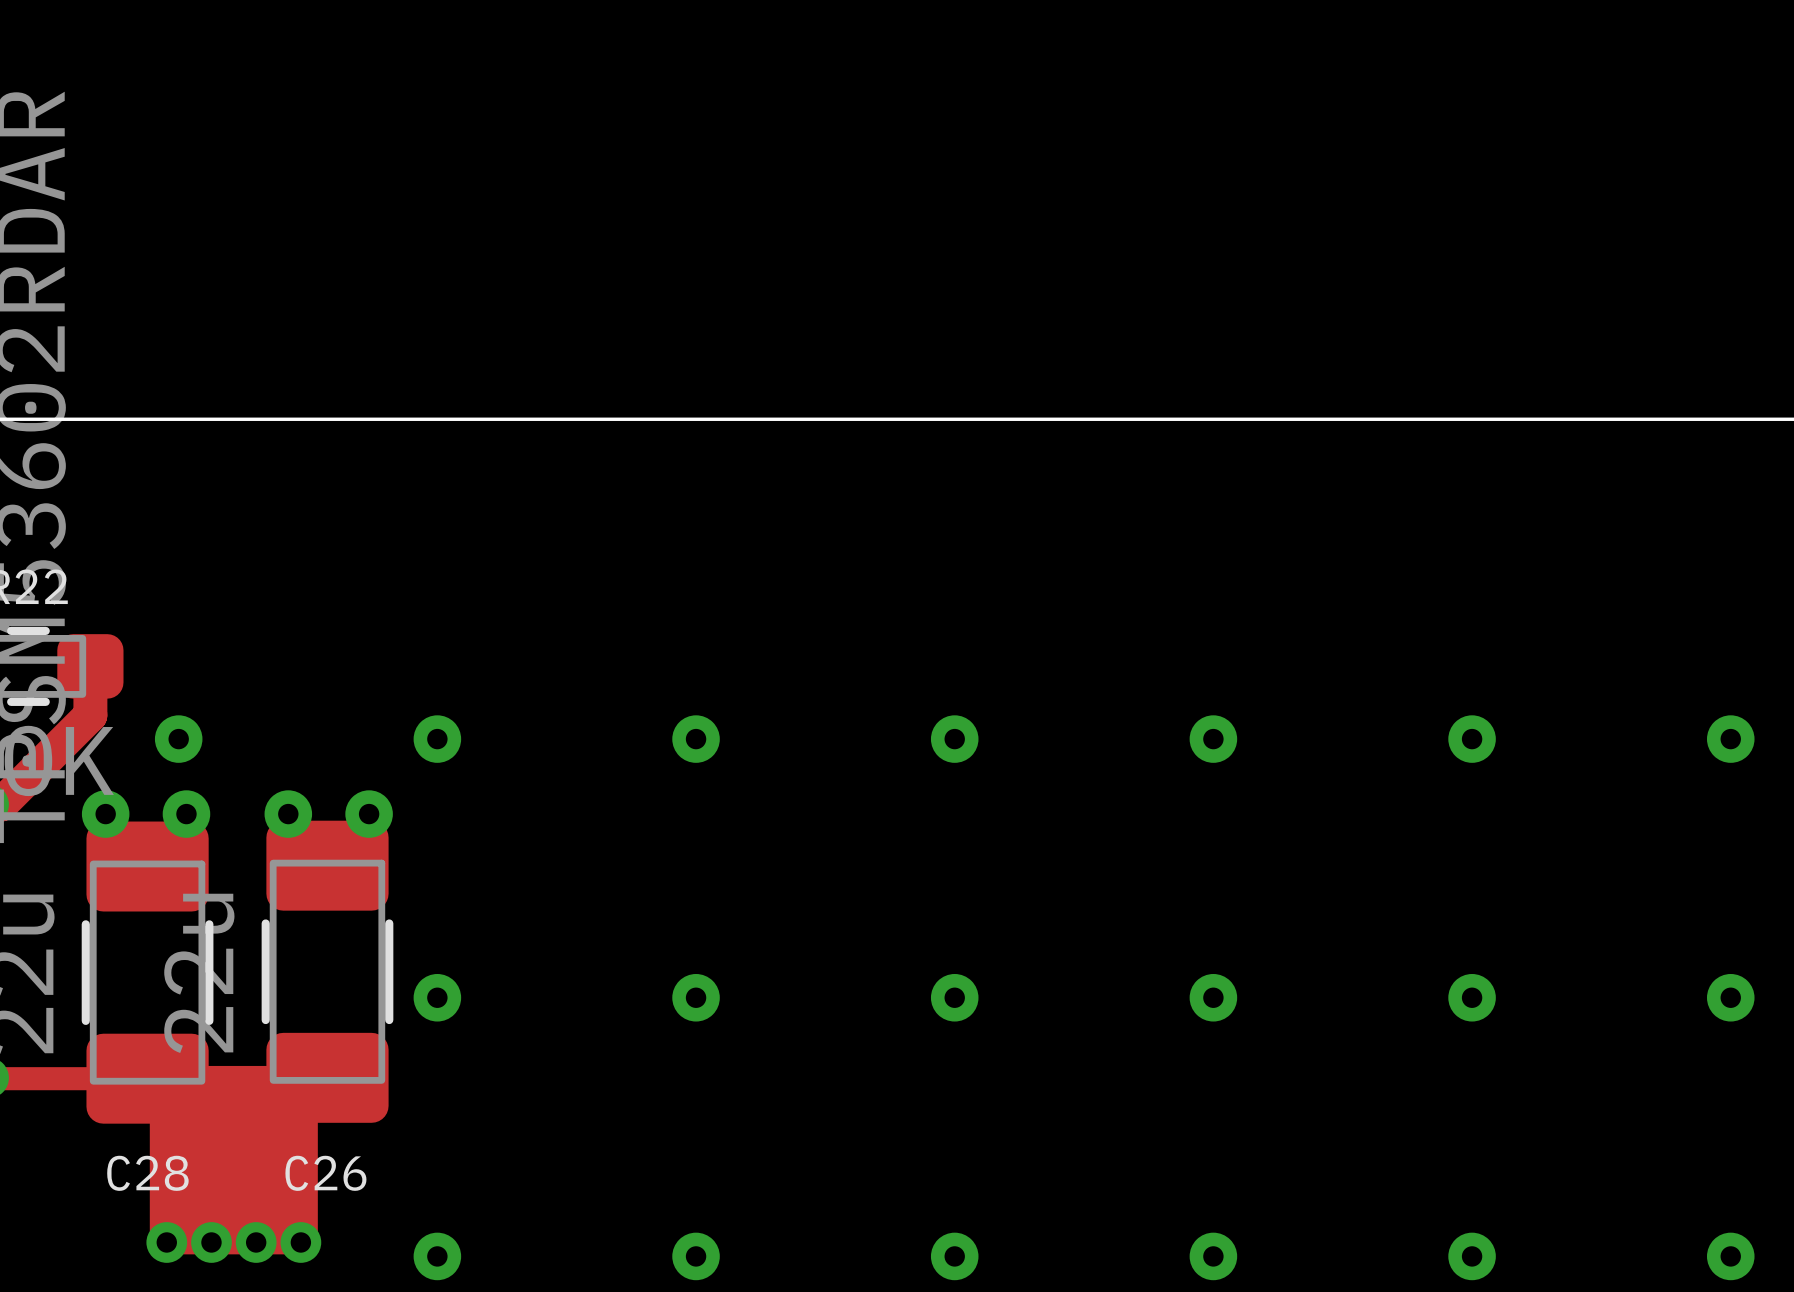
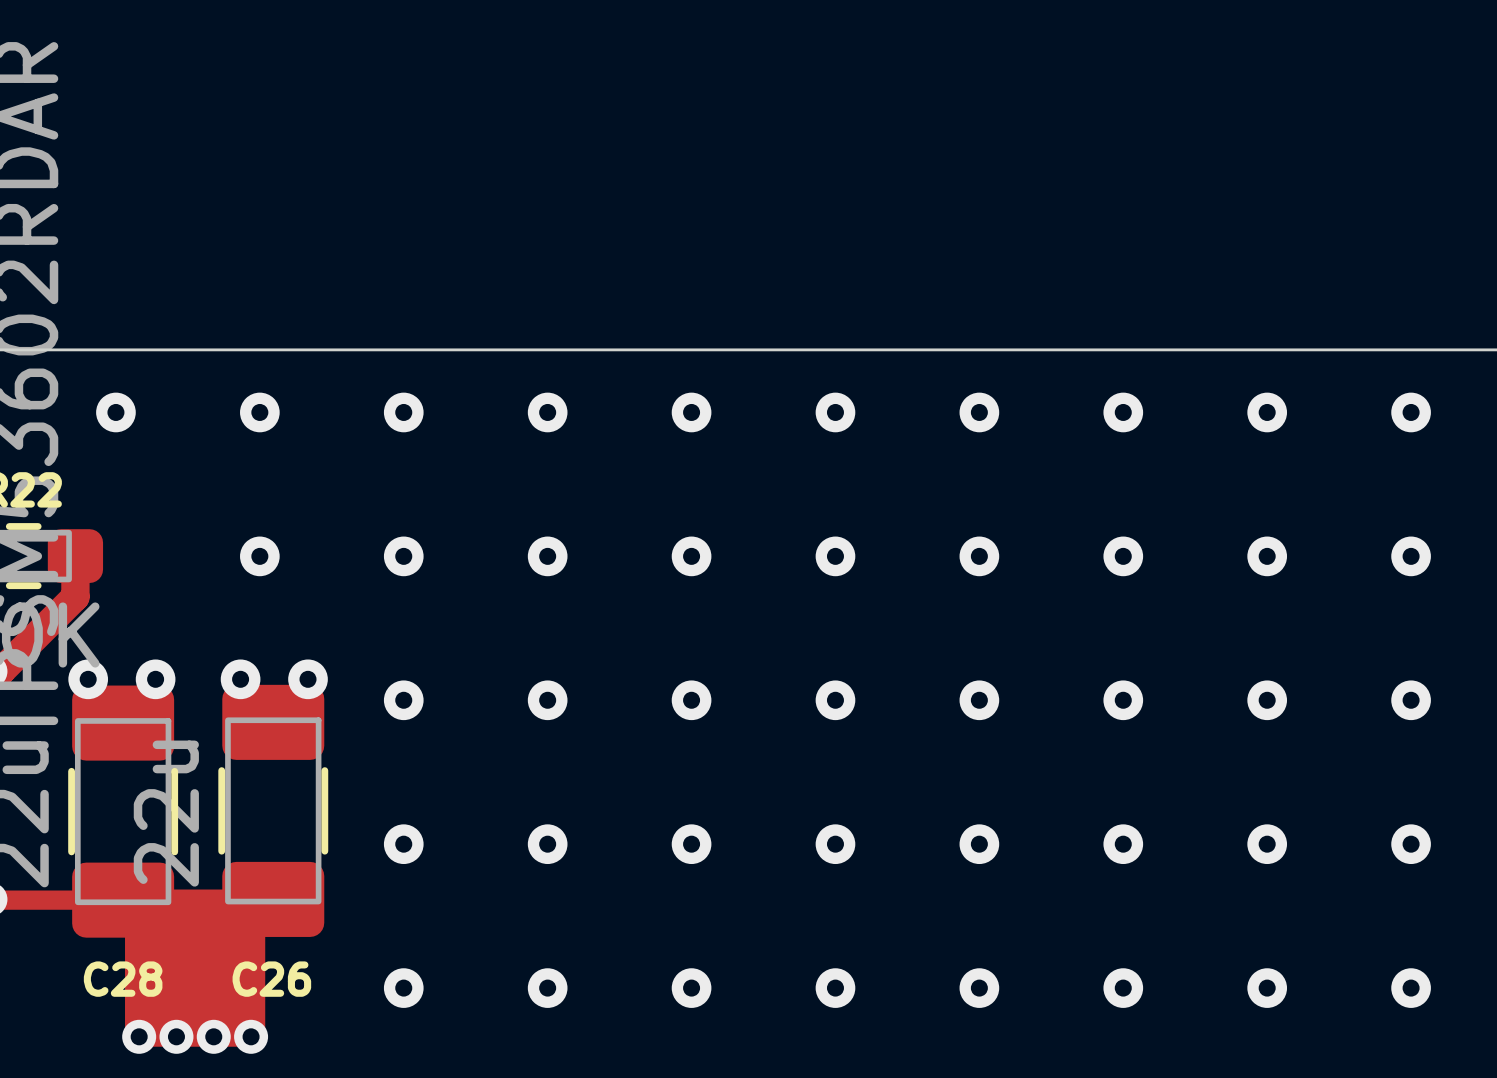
via: none -> (115, 412)
via: none -> (259, 412)
via: none -> (403, 412)
via: none -> (547, 412)
via: none -> (691, 412)
via: none -> (835, 412)
via: none -> (979, 412)
via: none -> (1123, 412)
via: none -> (1267, 412)
via: none -> (1411, 412)
via: none -> (259, 556)
via: none -> (403, 556)
via: none -> (547, 556)
via: none -> (691, 556)
via: none -> (835, 556)
via: none -> (979, 556)
via: none -> (1123, 556)
via: none -> (1267, 556)
via: none -> (1411, 556)
via: (178, 739) -> none
via: (437, 739) -> none
via: (696, 739) -> none
via: (954, 739) -> none
via: (1213, 739) -> none
via: (1472, 739) -> none
via: (1730, 739) -> none
via: none -> (403, 700)
via: none -> (547, 700)
via: none -> (691, 700)
via: none -> (835, 700)
via: none -> (979, 700)
via: none -> (1123, 700)
via: none -> (1267, 700)
via: none -> (1411, 700)
via position: (437, 997) -> (403, 844)
via position: (696, 997) -> (547, 844)
via position: (954, 997) -> (835, 844)
via position: (1213, 997) -> (979, 844)
via position: (1472, 997) -> (1267, 844)
via position: (1730, 997) -> (1411, 844)
via: none -> (691, 844)
via: none -> (1123, 844)
via: none -> (547, 988)
via: none -> (691, 988)
via: none -> (835, 988)
via: none -> (979, 988)
via: none -> (1123, 988)
via: none -> (1267, 988)
via: none -> (1411, 988)
via position: (437, 1256) -> (403, 988)
via: (696, 1256) -> none
via: (954, 1256) -> none
via: (1213, 1256) -> none
via: (1472, 1256) -> none
via: (1730, 1256) -> none

